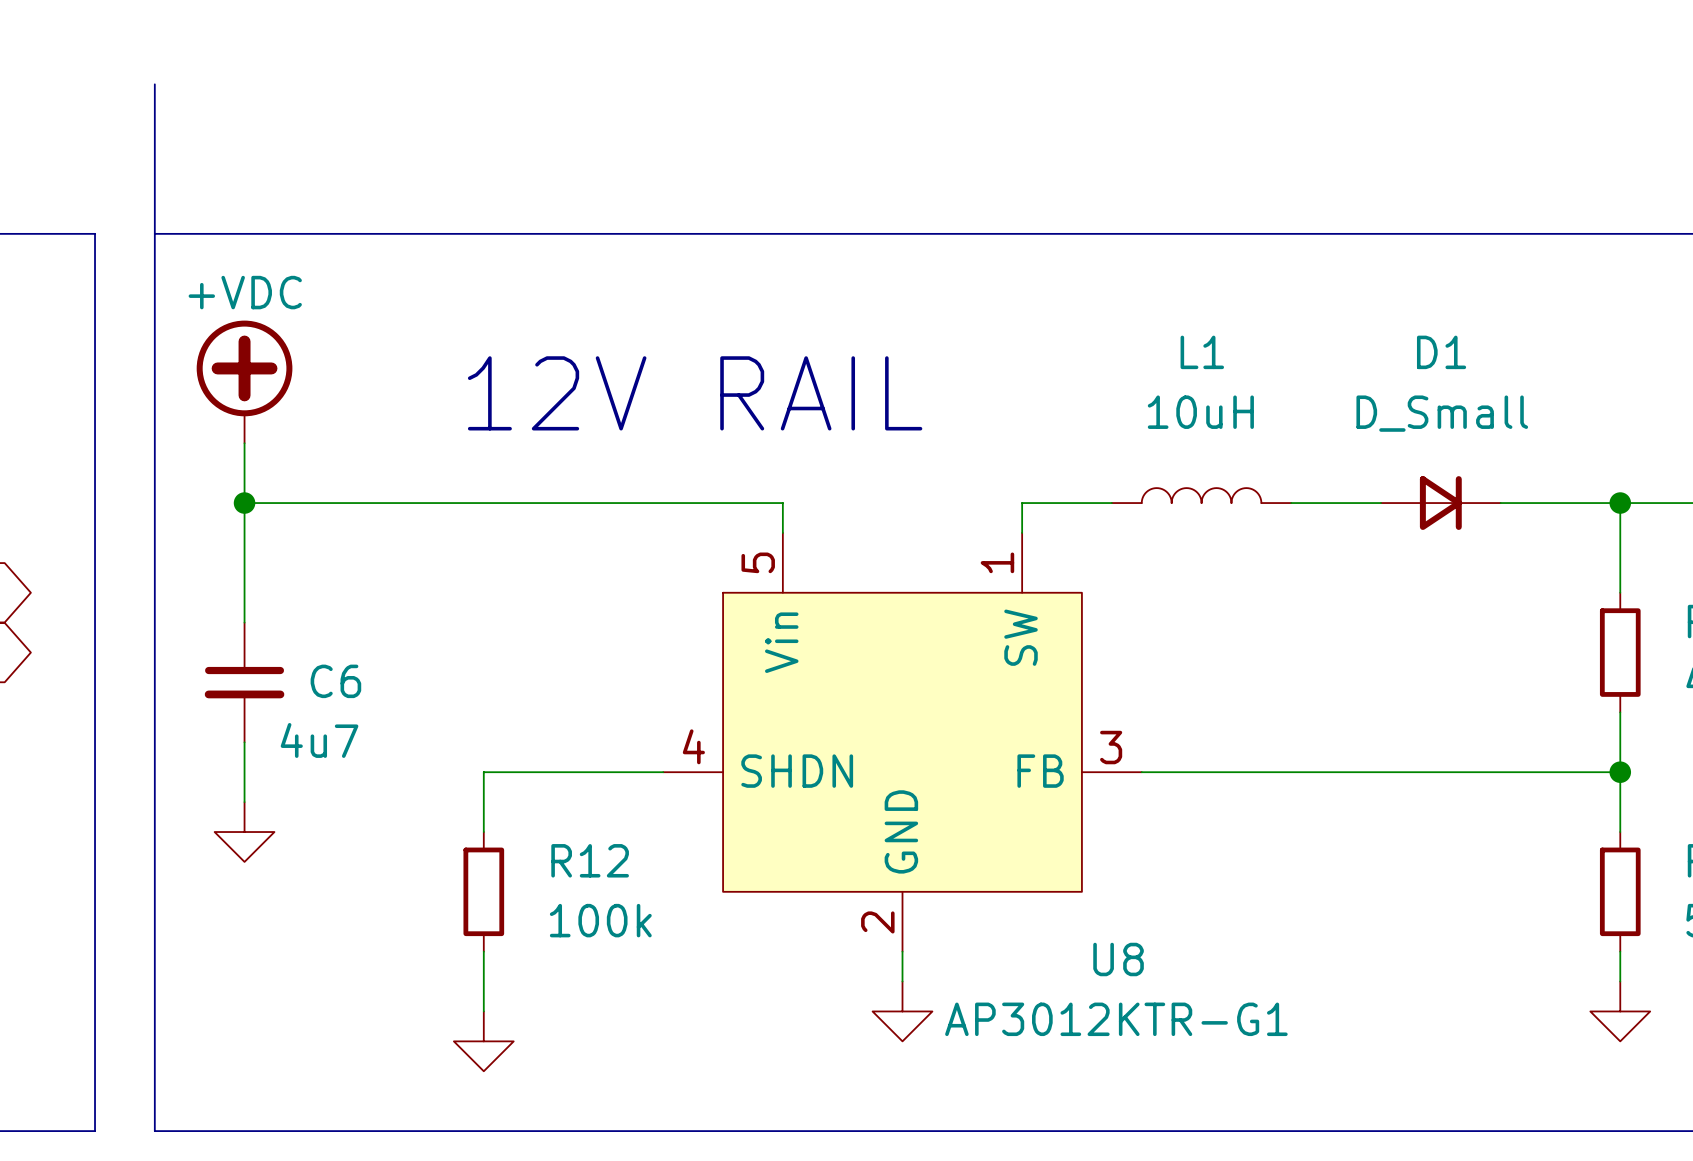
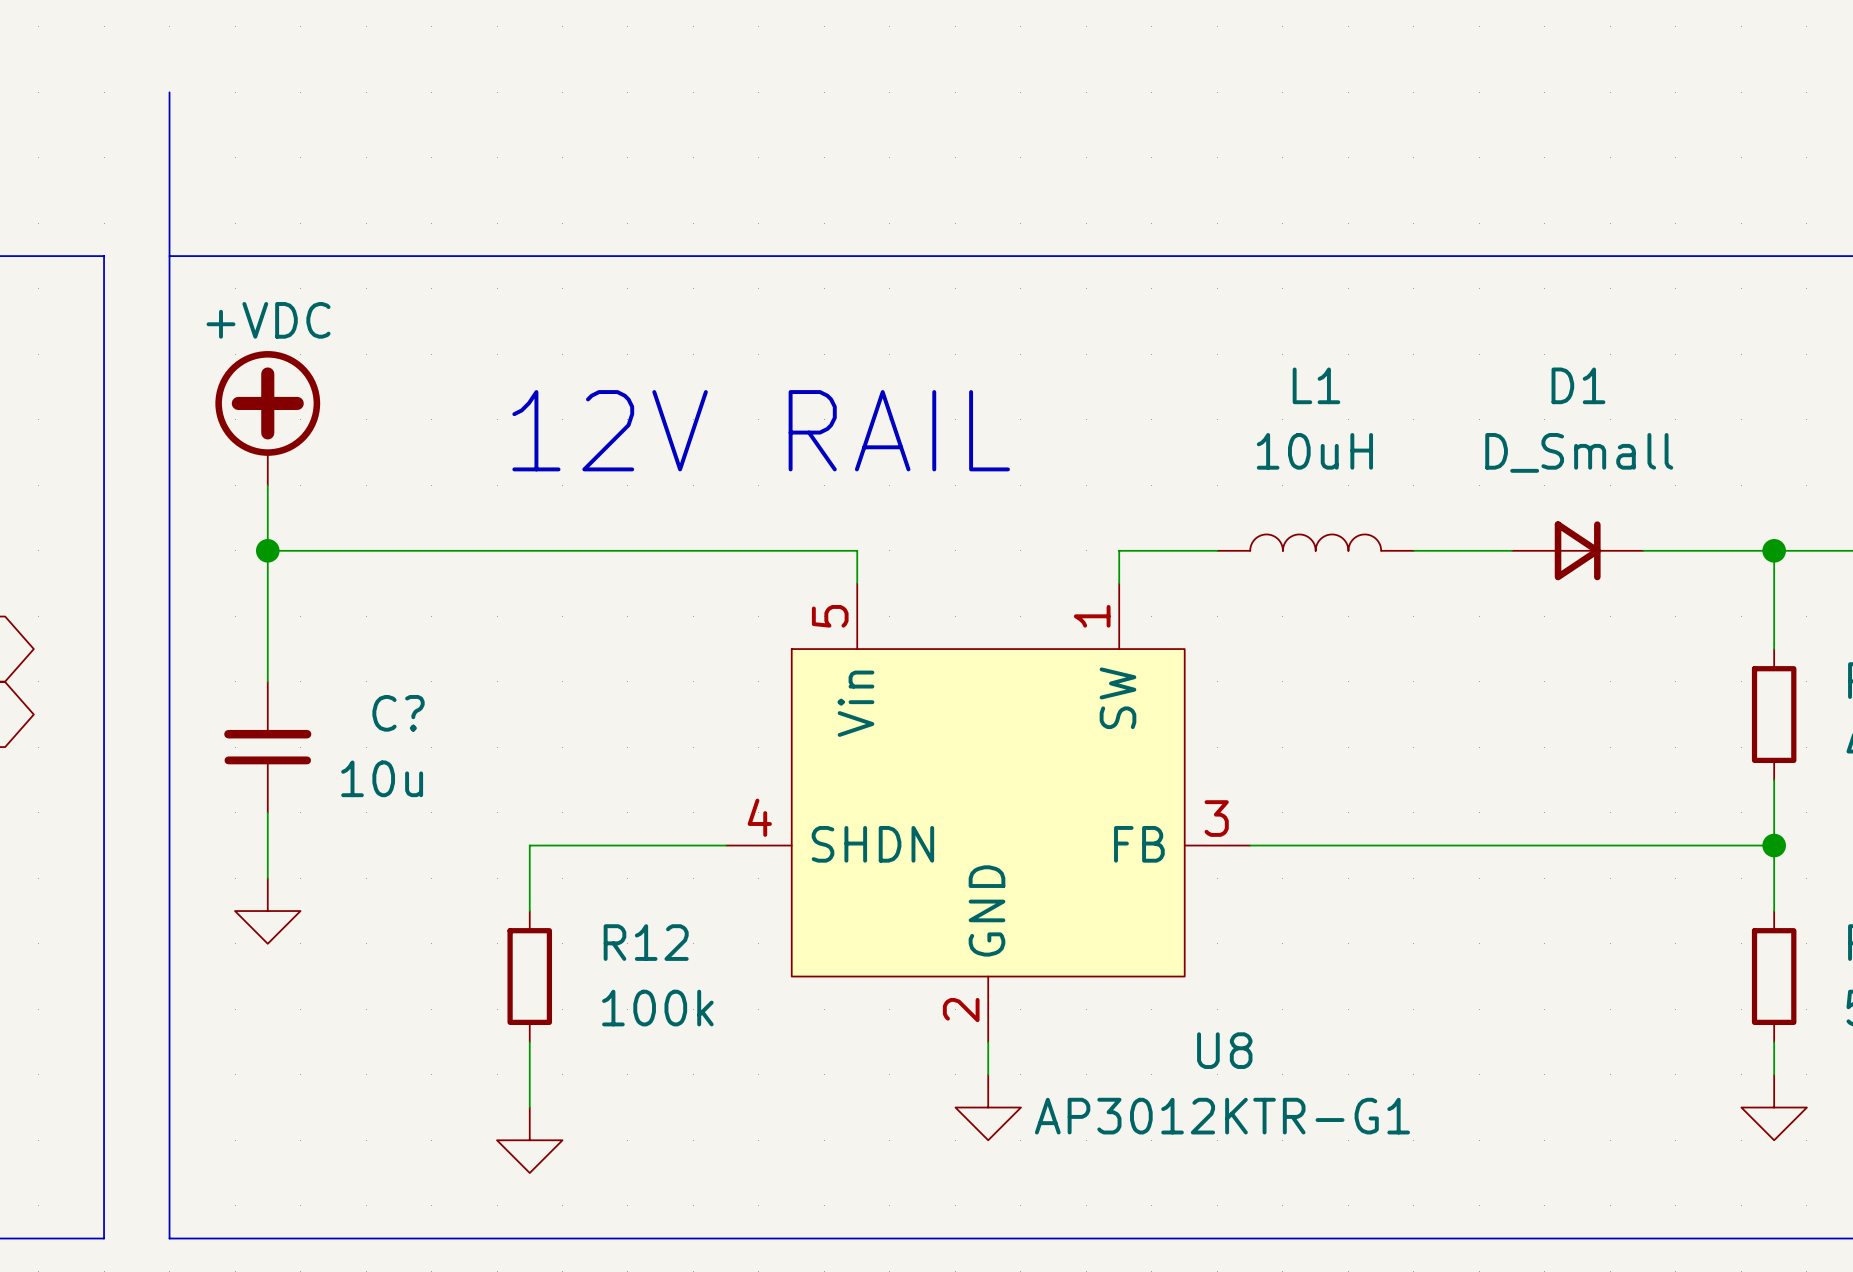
C6: 4u7 (244, 682) -> none
C?: none -> 10u (267, 747)

